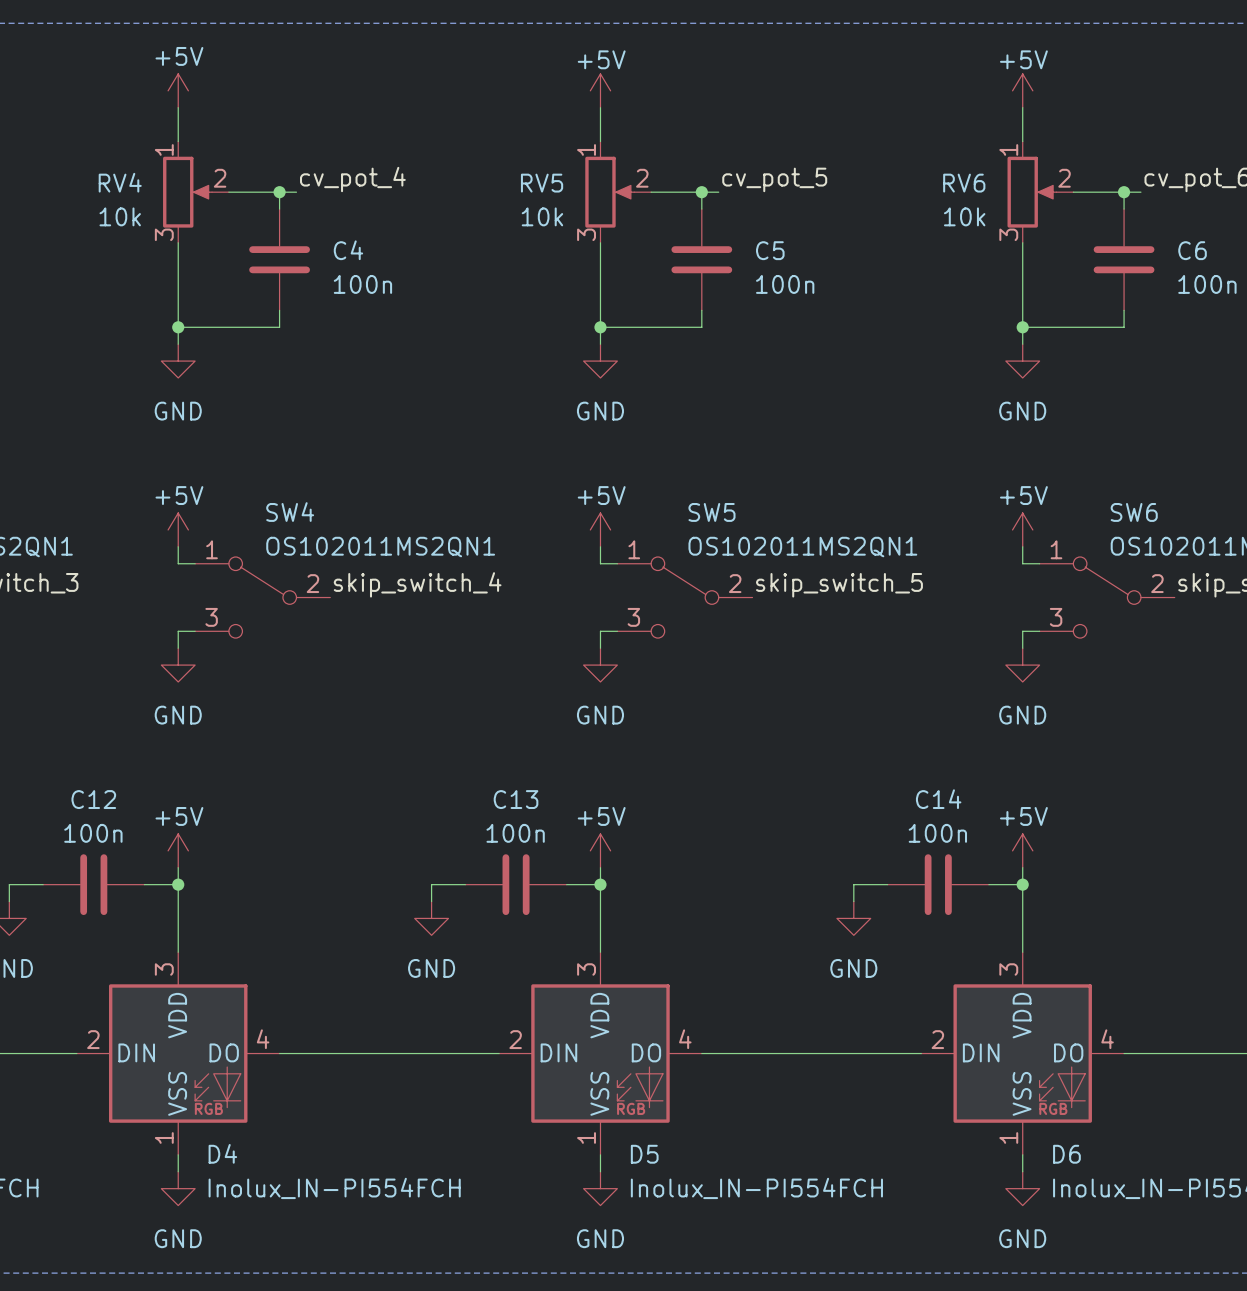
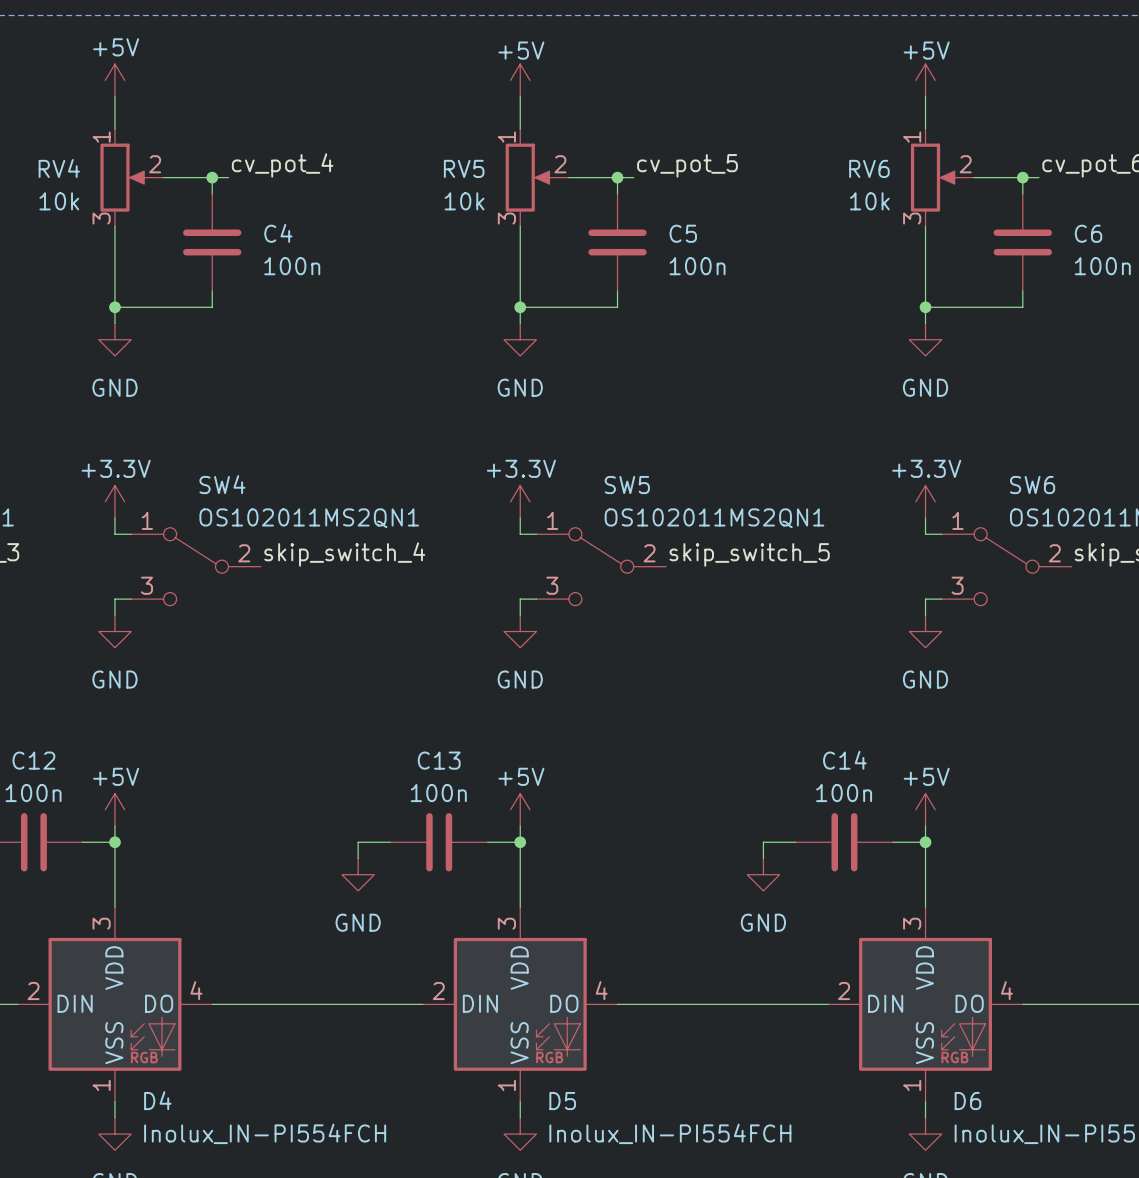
power symbol: +5V (178, 529) -> +3.3V (114, 501)
power symbol: +5V (600, 529) -> +3.3V (520, 501)
power symbol: +5V (1022, 529) -> +3.3V (925, 501)

